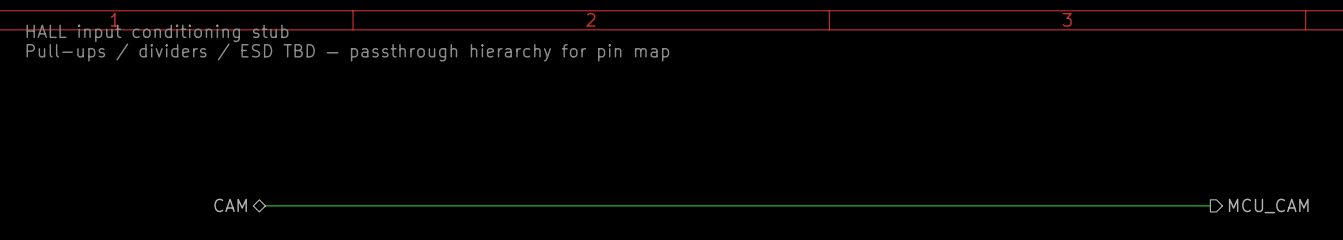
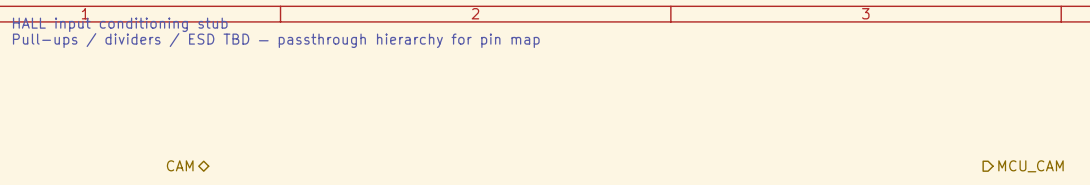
wire: (265, 205) (1210, 205) -> none

